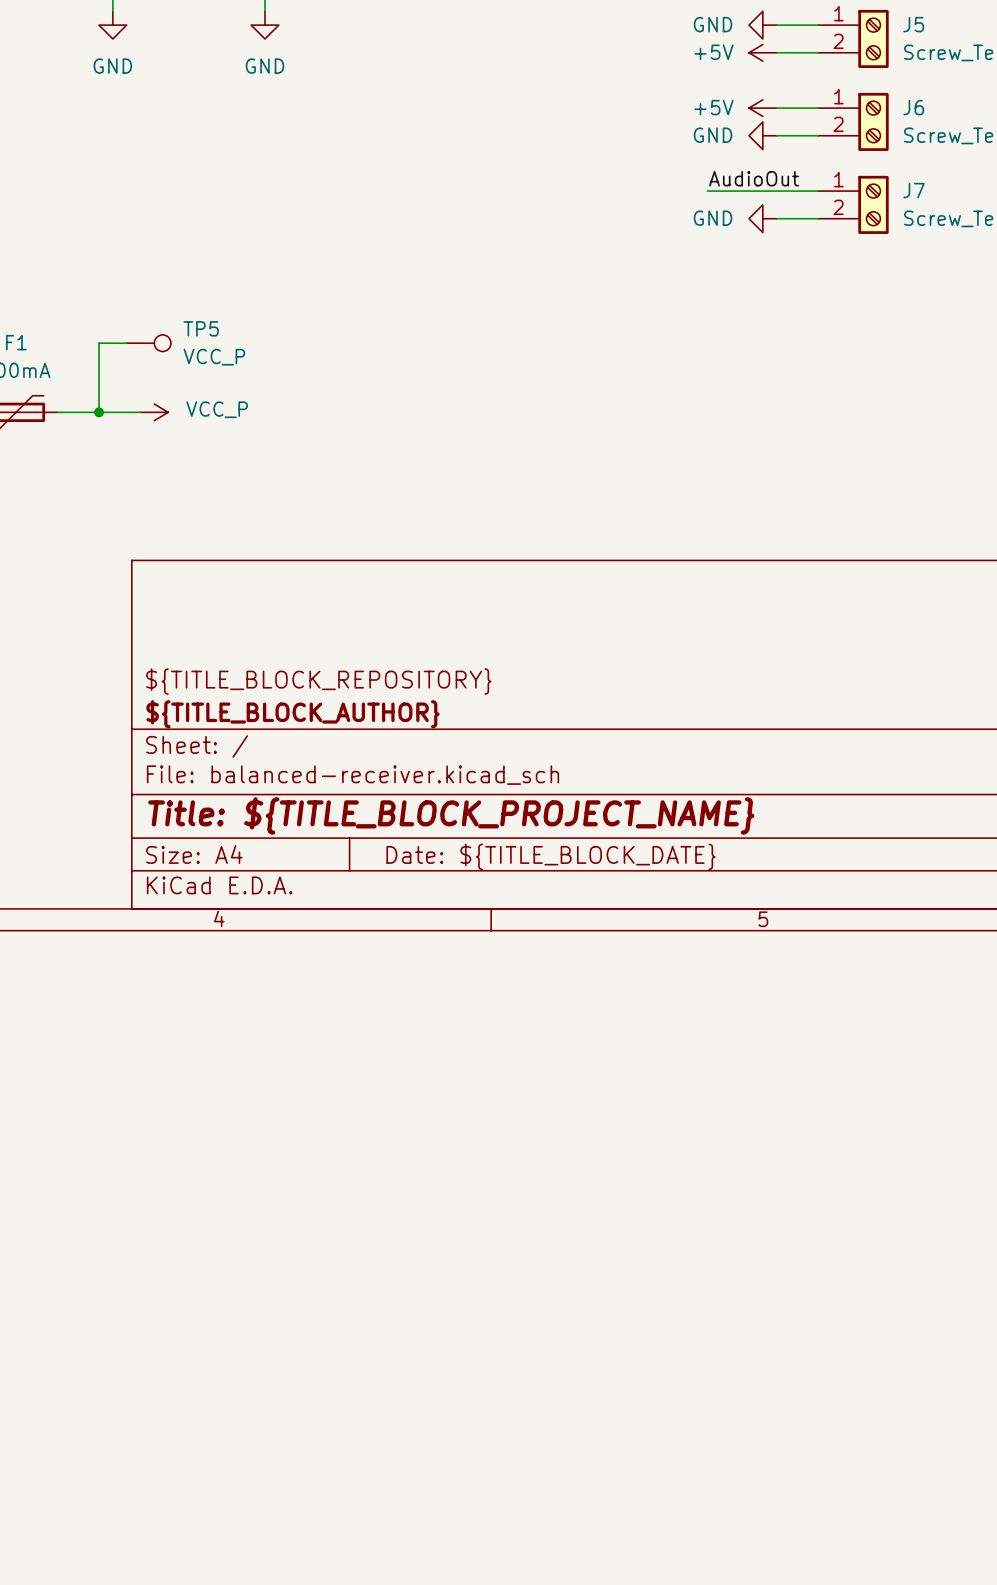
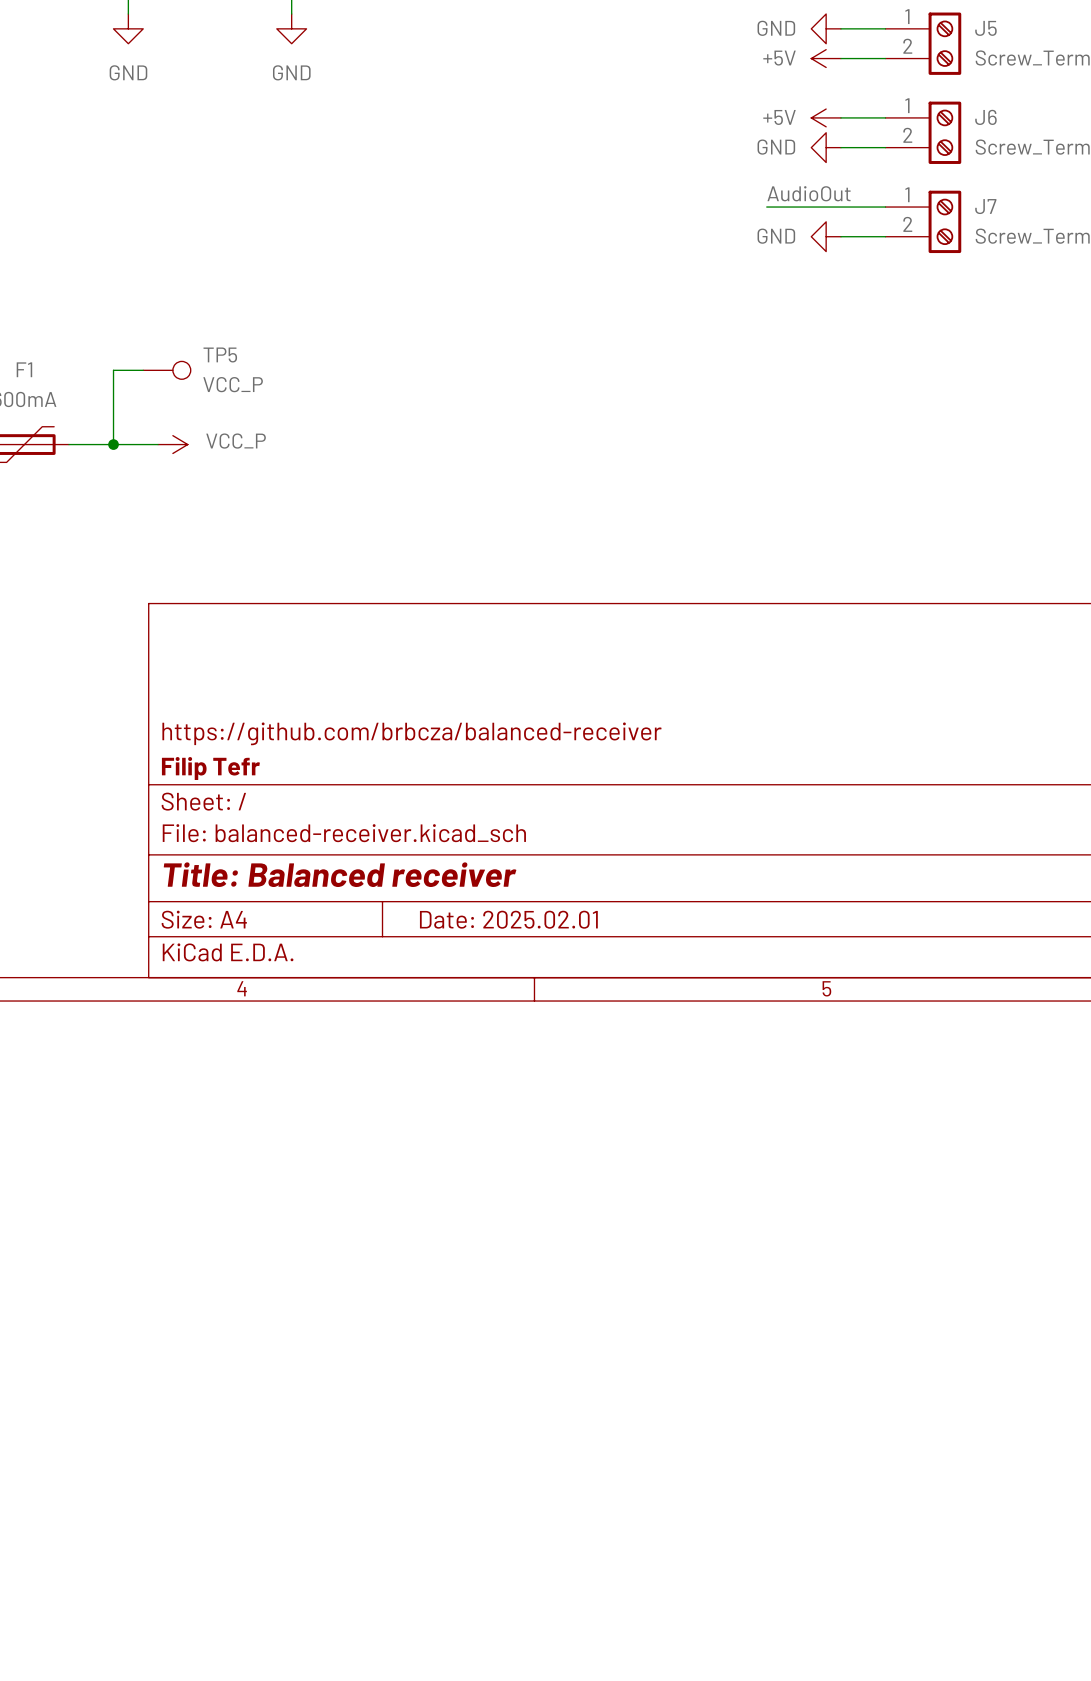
title block: ${TITLE_BLOCK_REPOSITORY} (318, 681) -> https://github.com/brbcza/balanced-receiver (412, 733)
title block: ${TITLE_BLOCK_AUTHOR} (293, 714) -> Filip Tefr (210, 768)
title block: Title: ${TITLE_BLOCK_PROJECT_NAME} (451, 815) -> Title: Balanced receiver (340, 874)
title block: Date: ${TITLE_BLOCK_DATE} (550, 856) -> Date: 2025.02.01 (508, 919)

